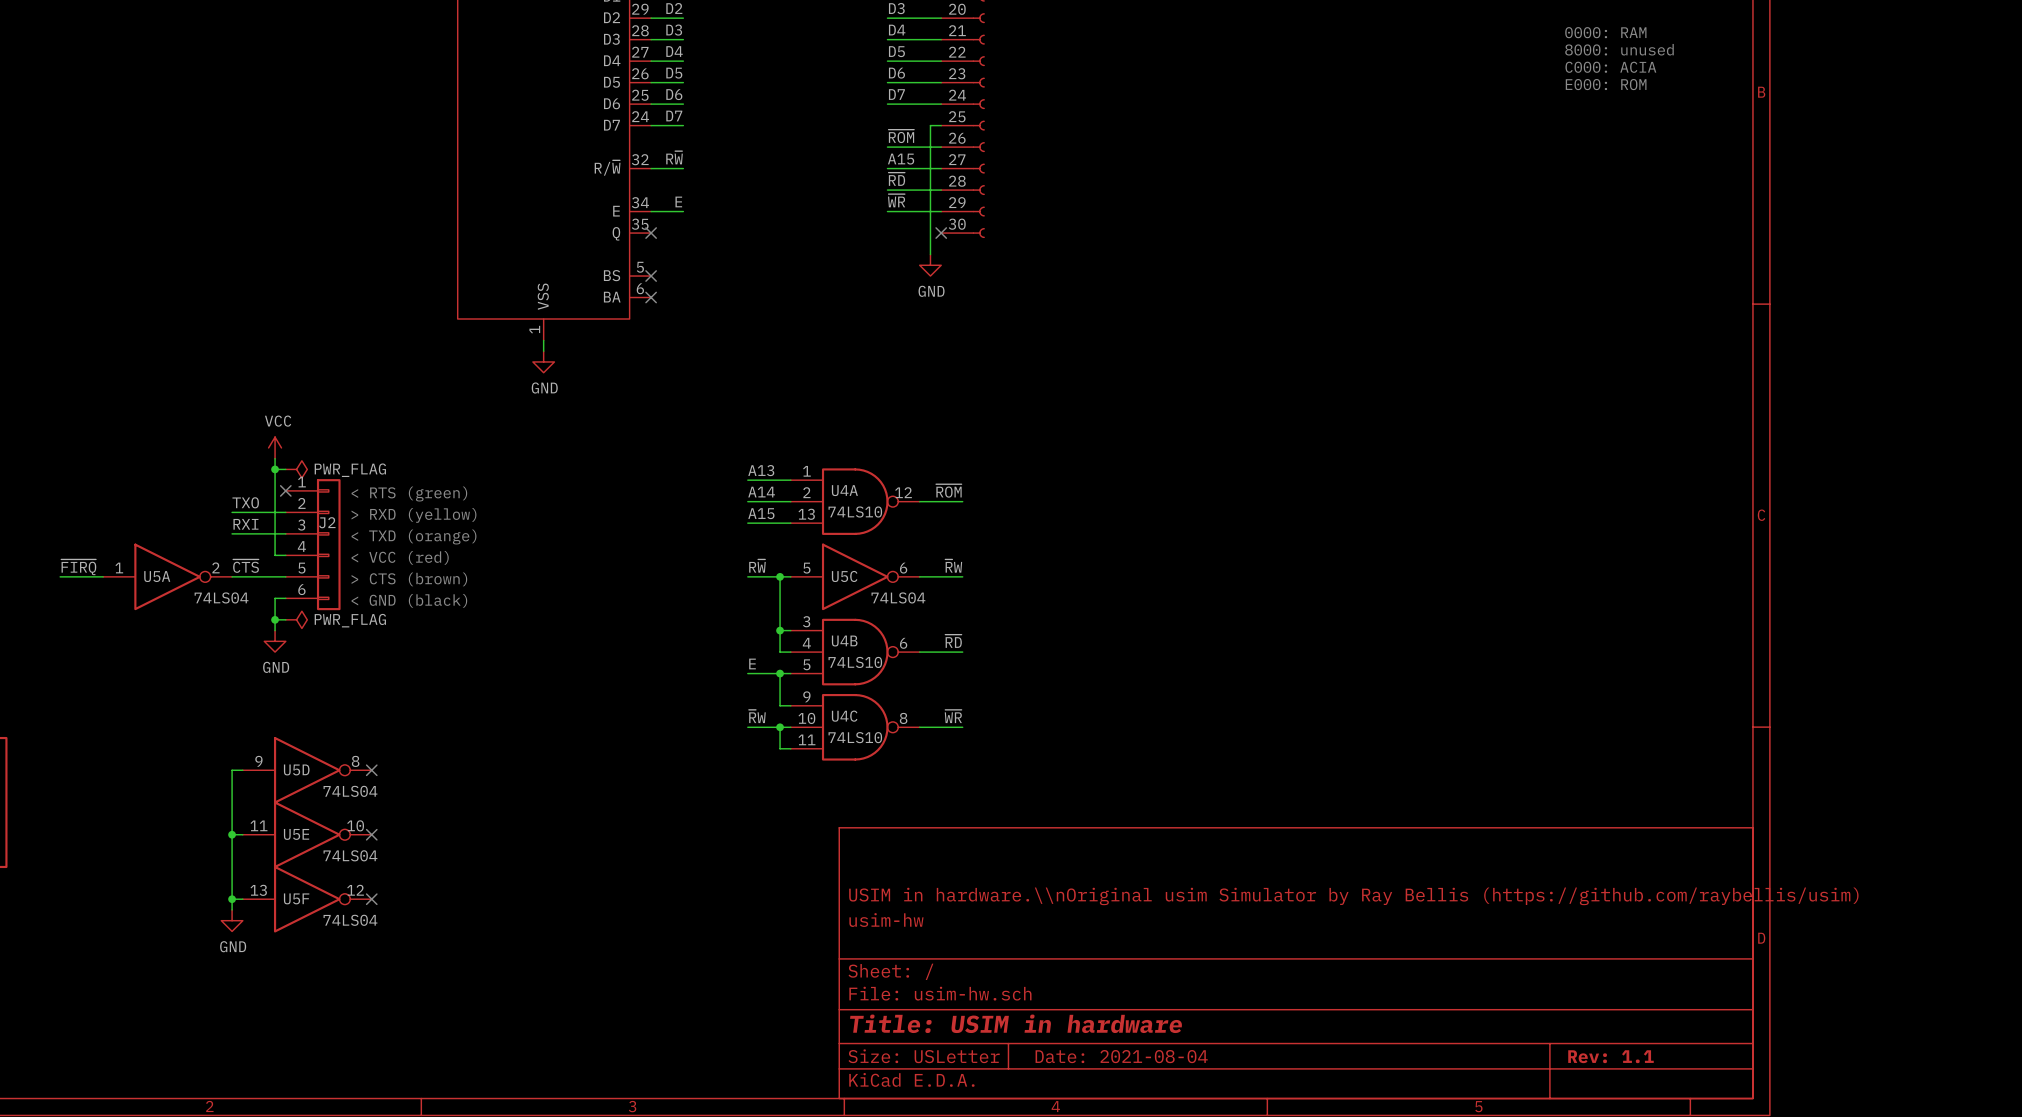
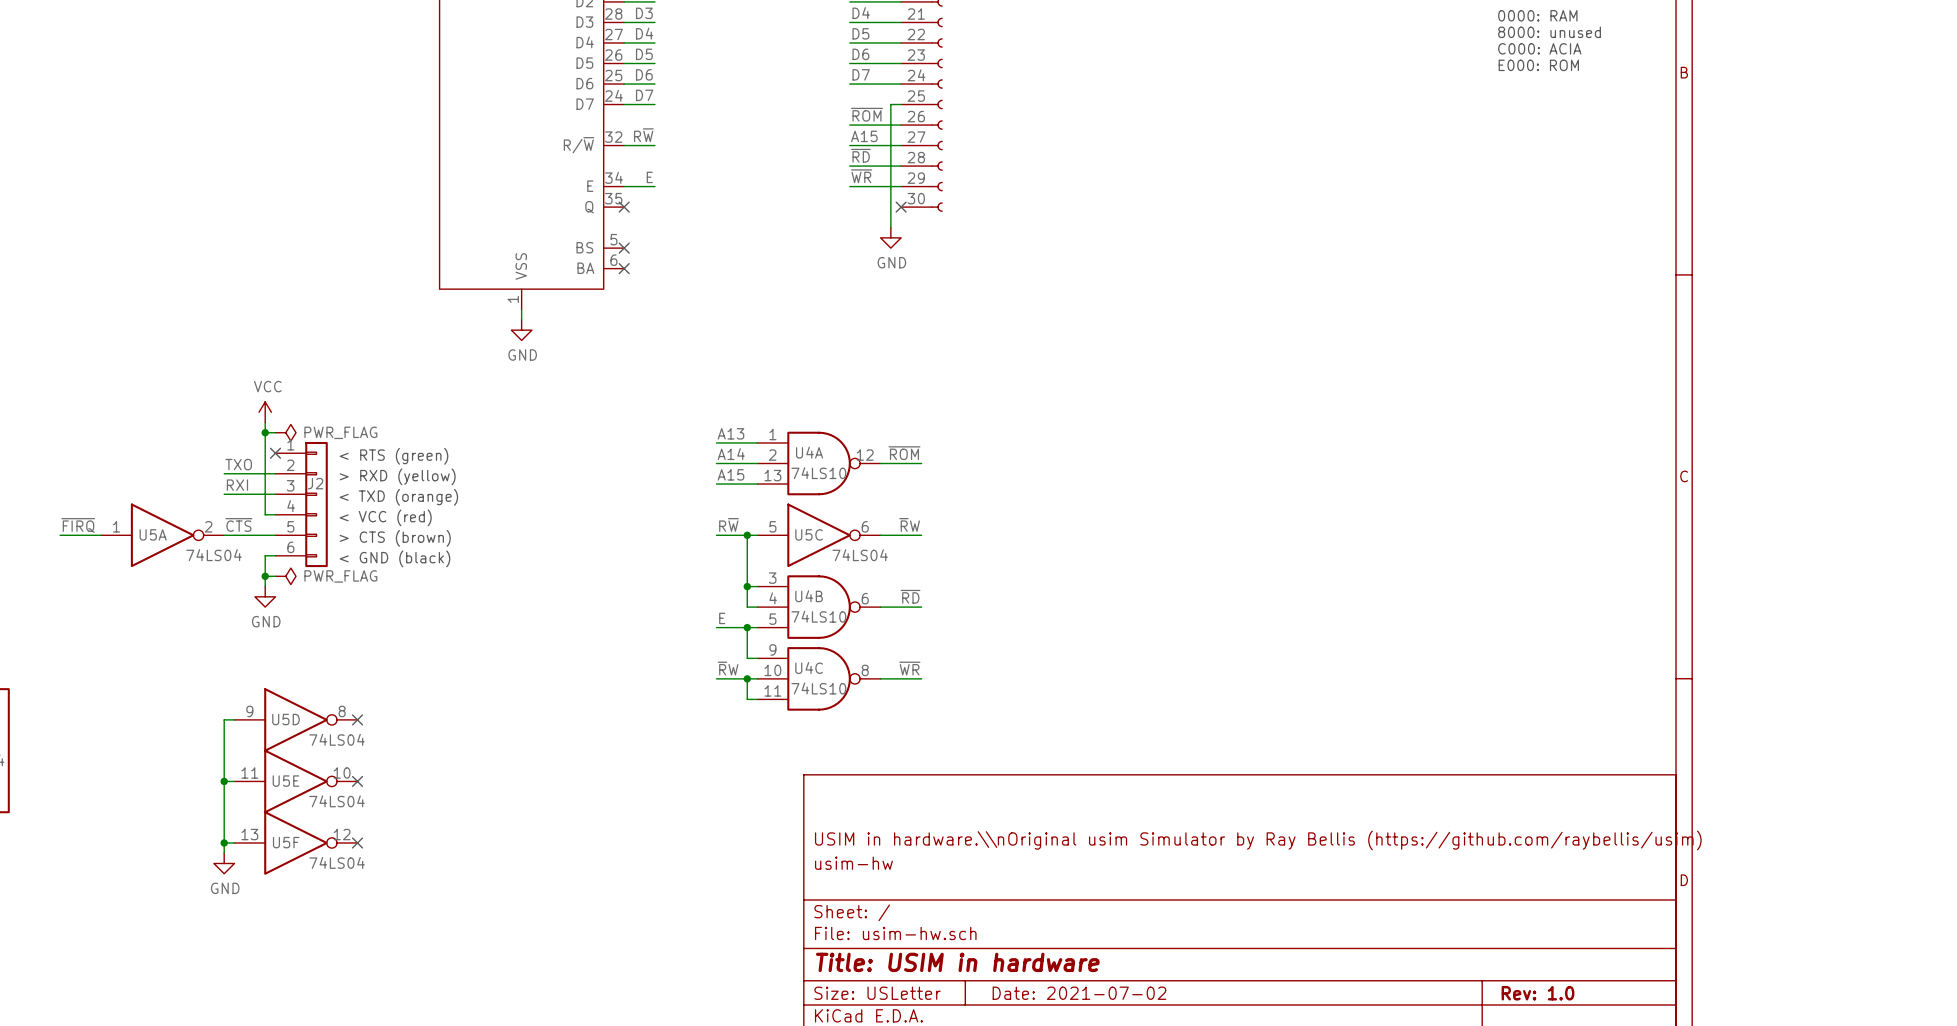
title block: Date: 2021-08-04 (1121, 1056) -> Date: 2021-07-02 (1079, 993)
title block: Rev: 1.1 (1610, 1056) -> Rev: 1.0 (1538, 993)

